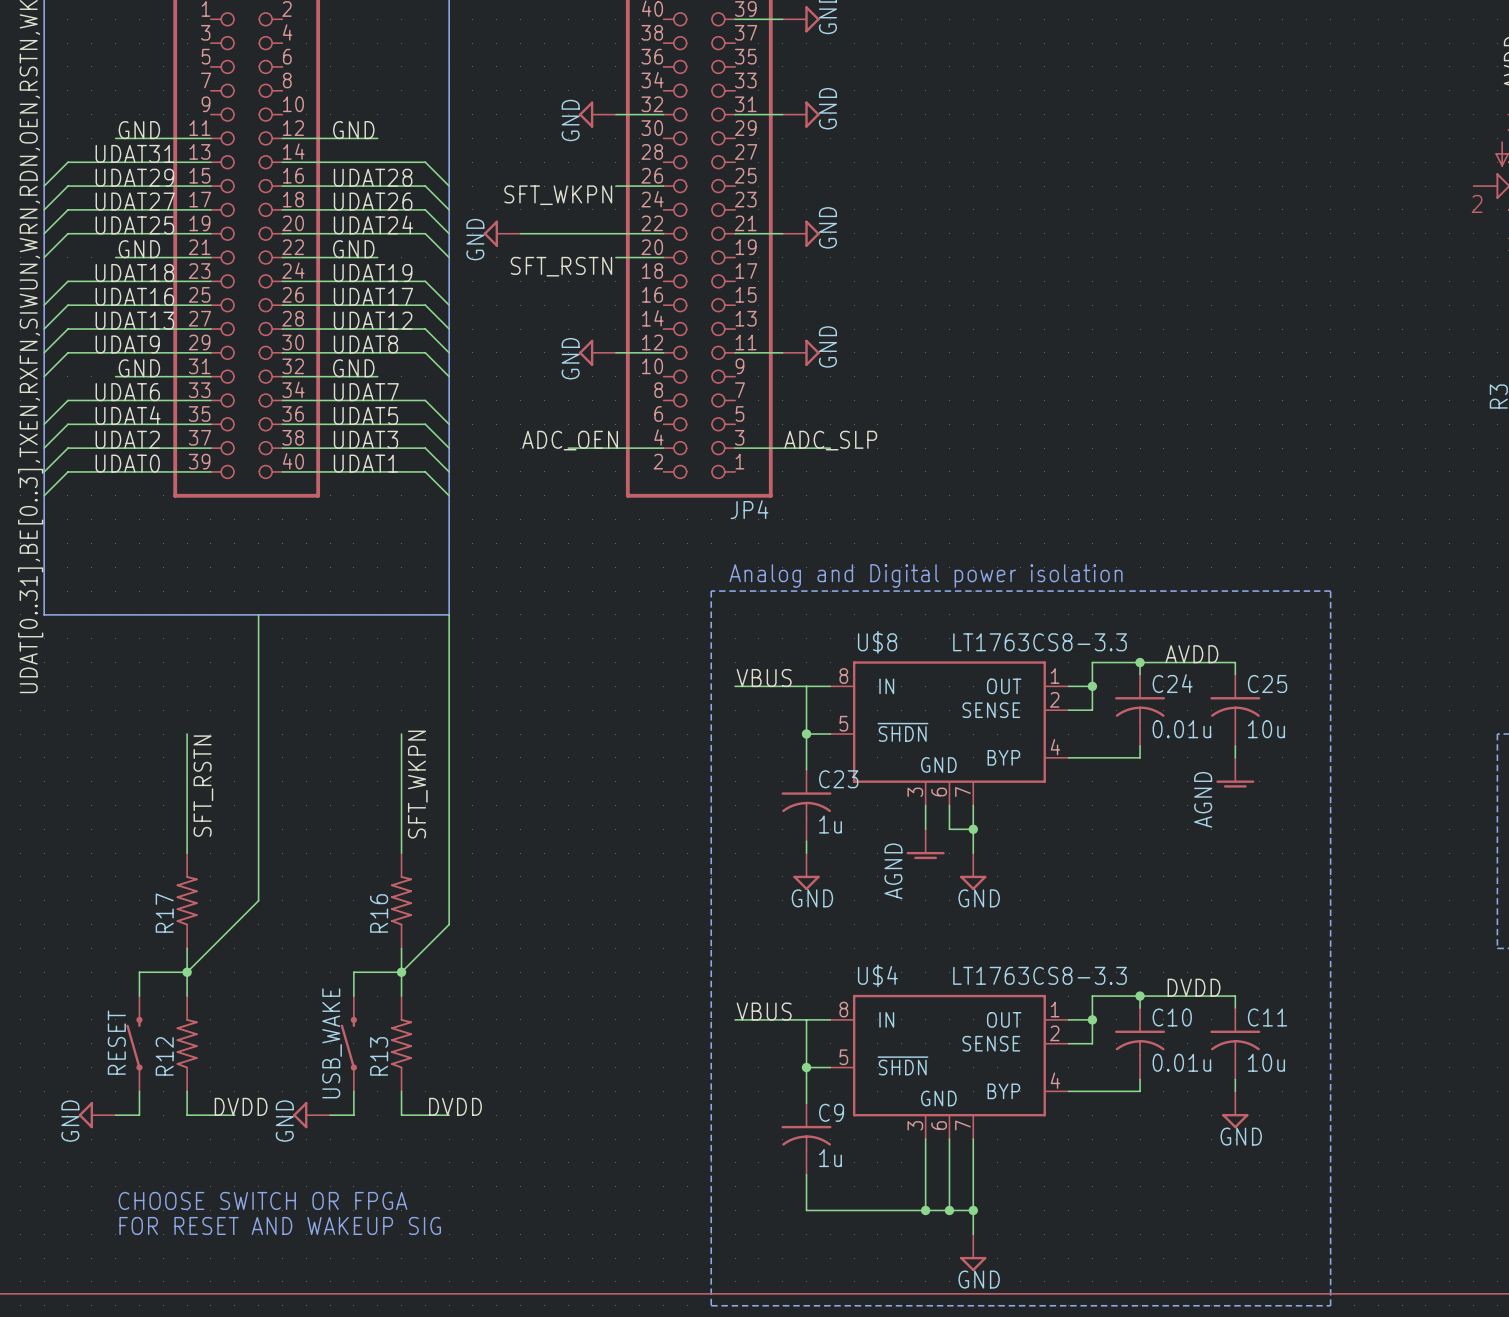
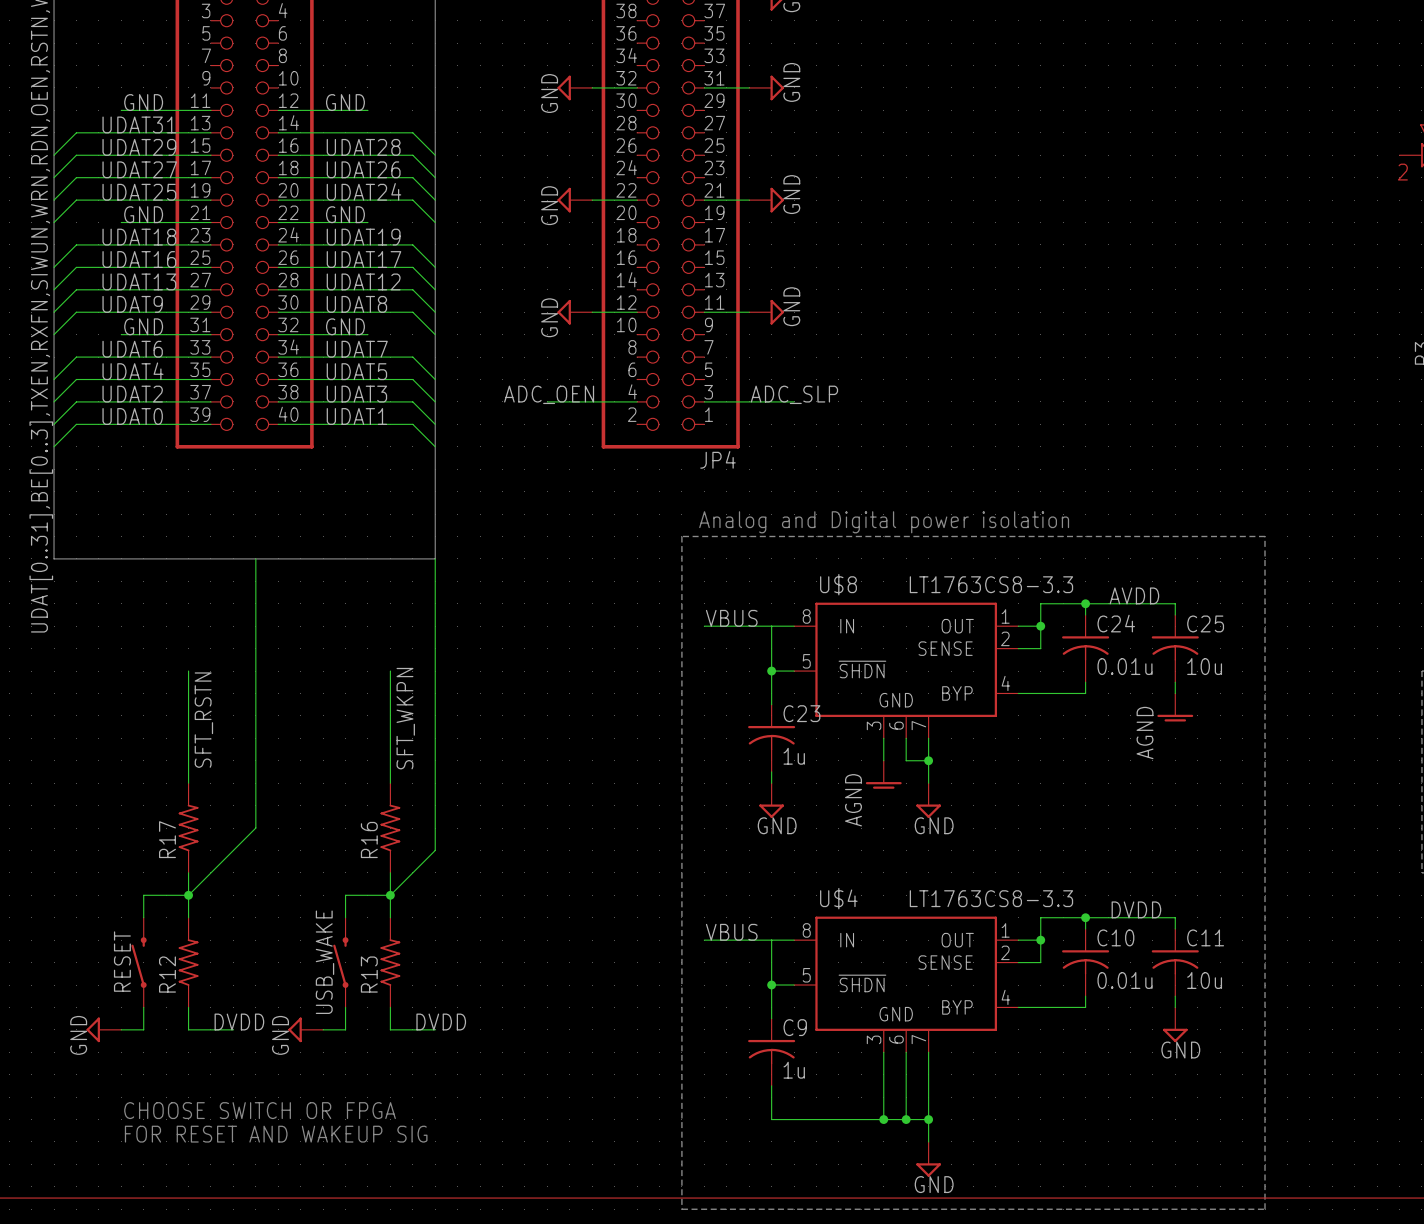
wire: (615, 186) (663, 186) -> none
label: SFT_WKPN (558, 195) -> none
power symbol position: GND (502, 233) -> GND (574, 200)
wire: (520, 233) (615, 233) -> none
wire: (615, 257) (663, 257) -> none
label: SFT_RSTN (561, 266) -> none

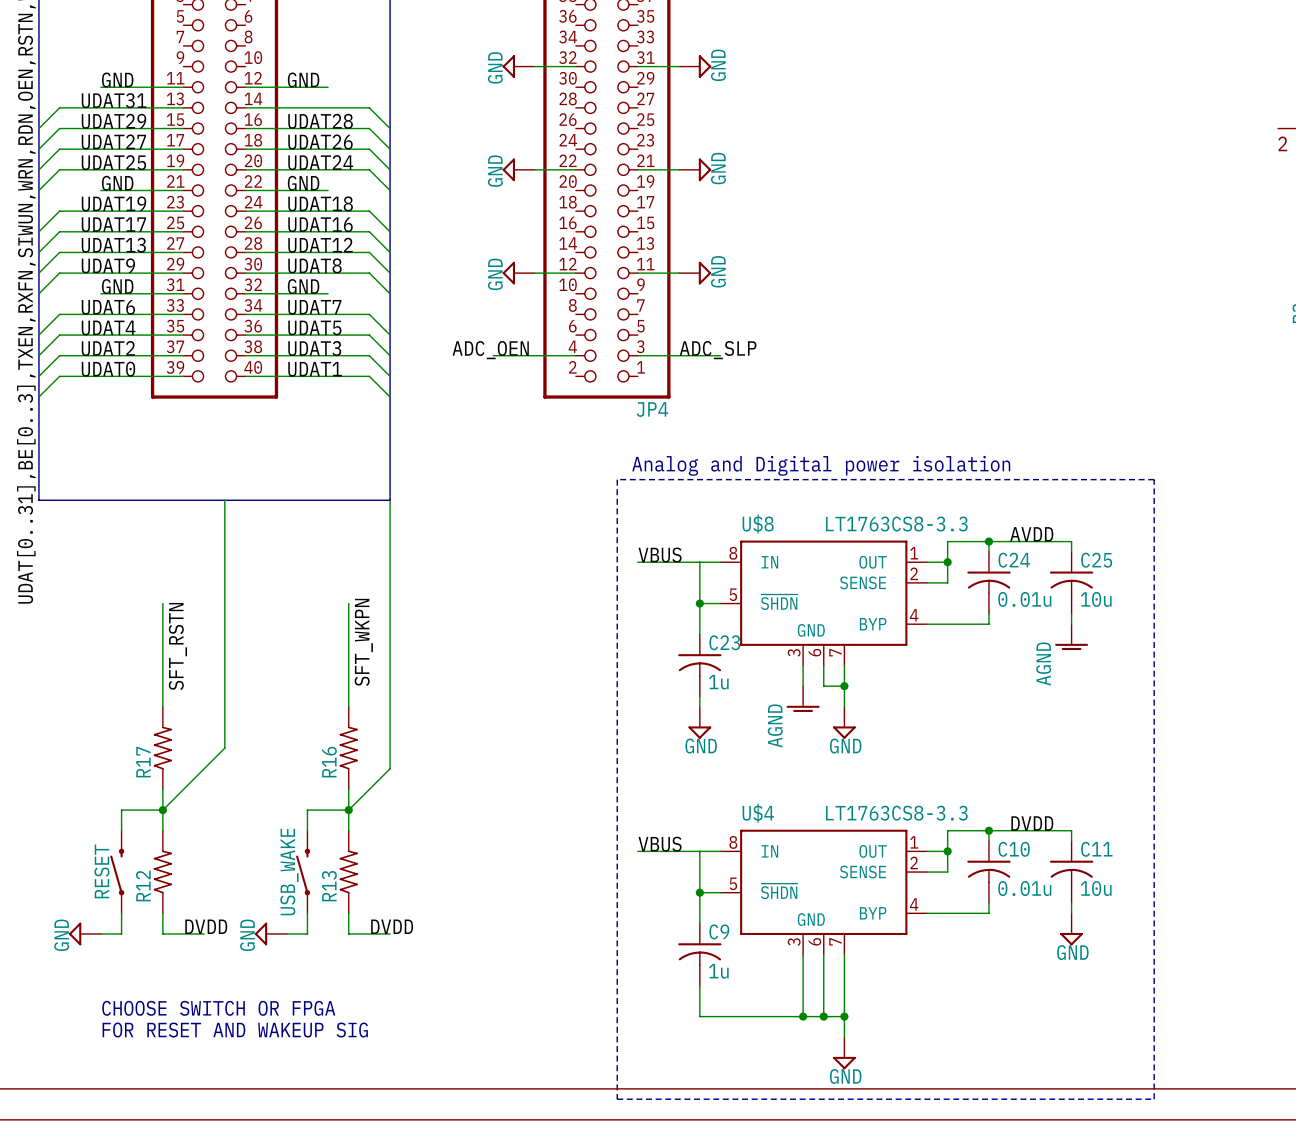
label: UDAT18 (139, 237) -> UDAT19 (113, 203)
label: UDAT19 (363, 237) -> UDAT18 (320, 203)
label: UDAT16 (139, 259) -> UDAT17 (113, 224)
label: UDAT17 (363, 259) -> UDAT16 (320, 224)

